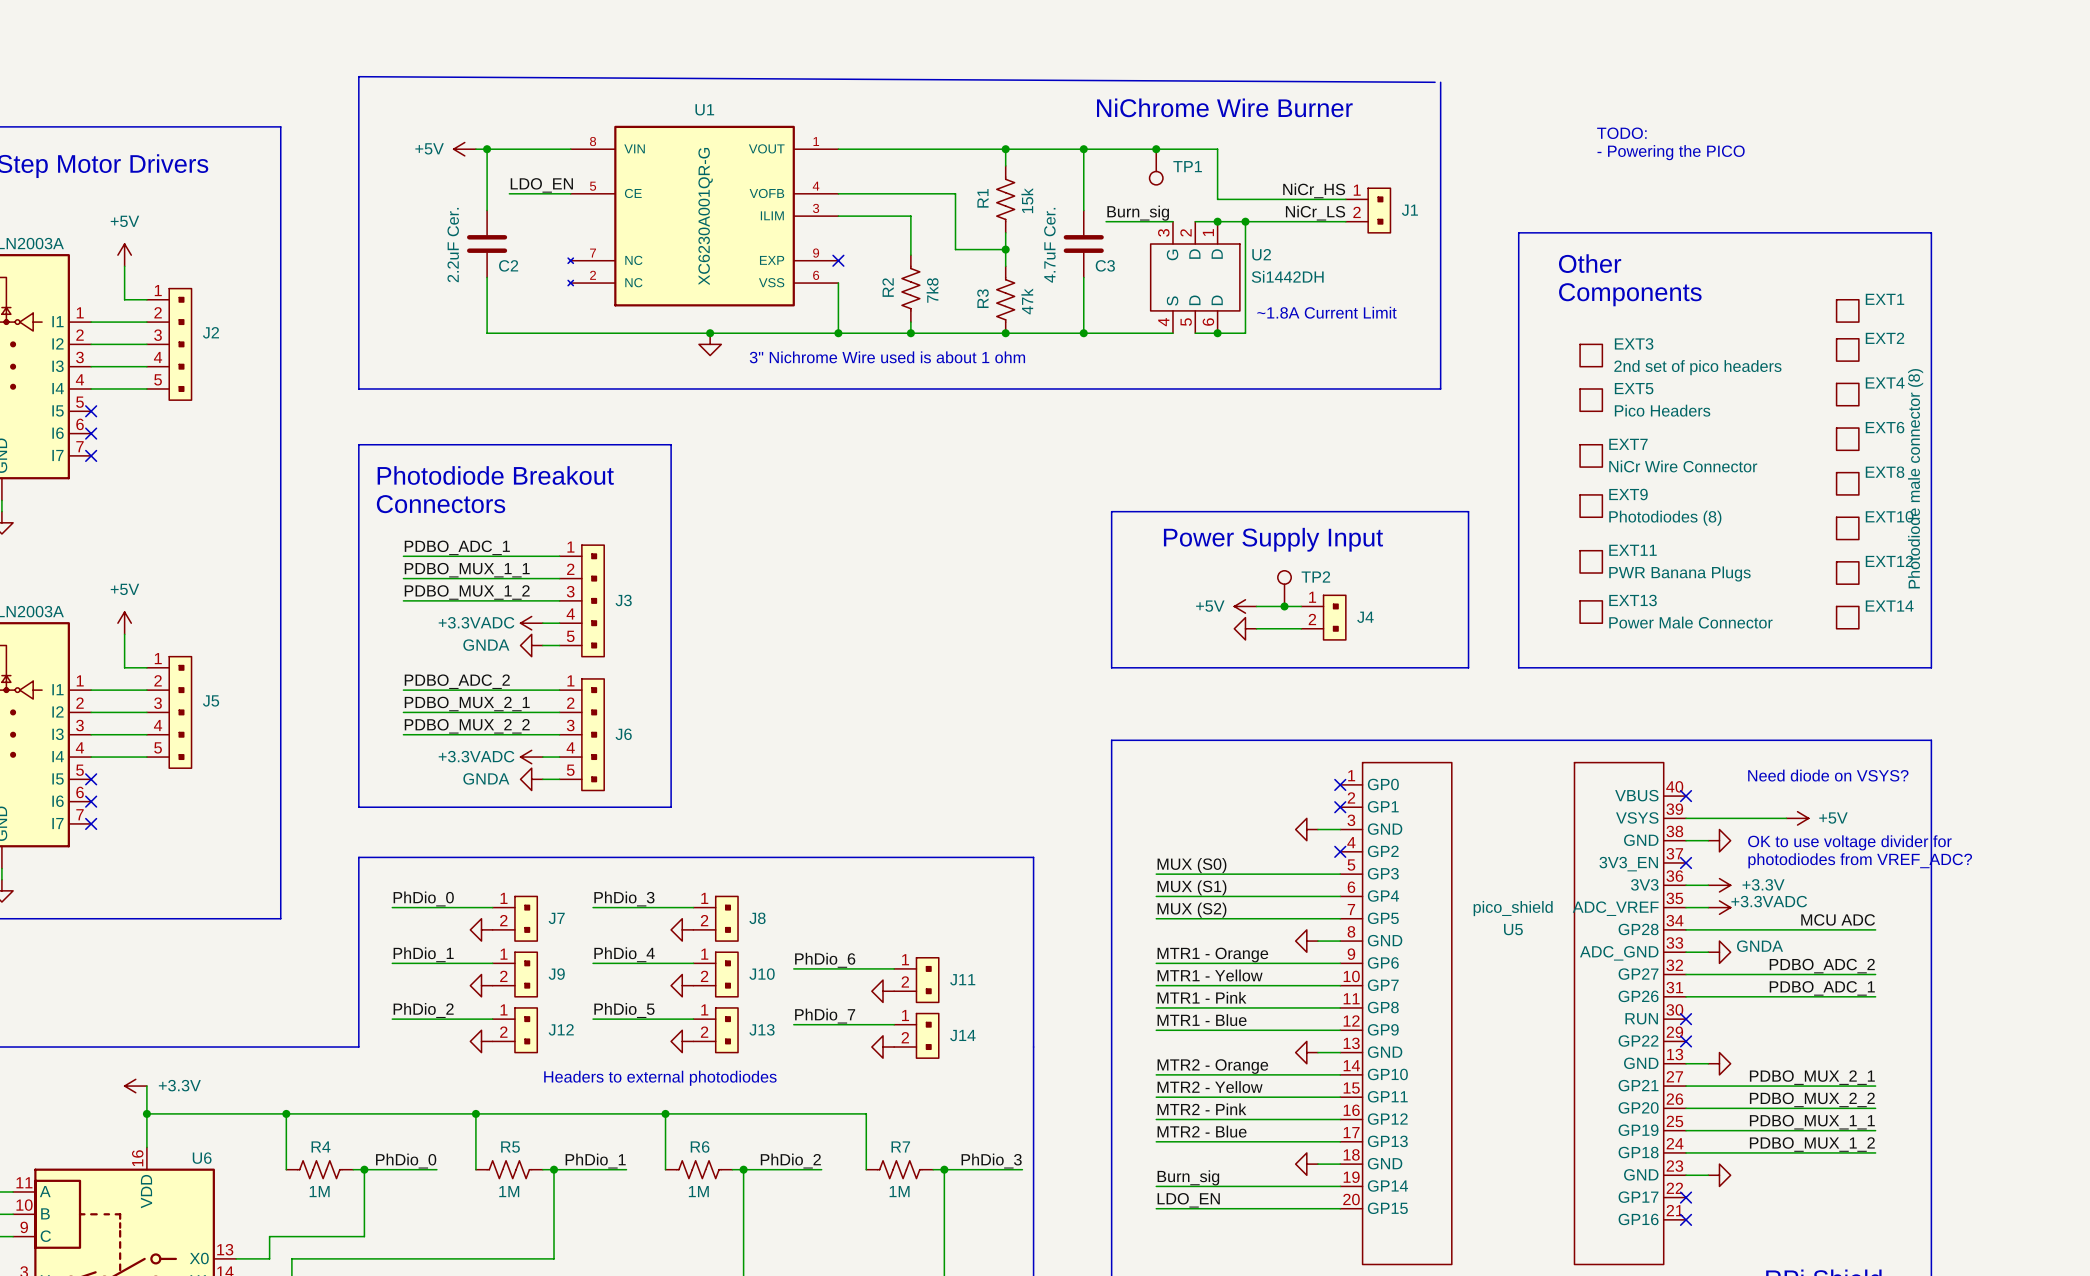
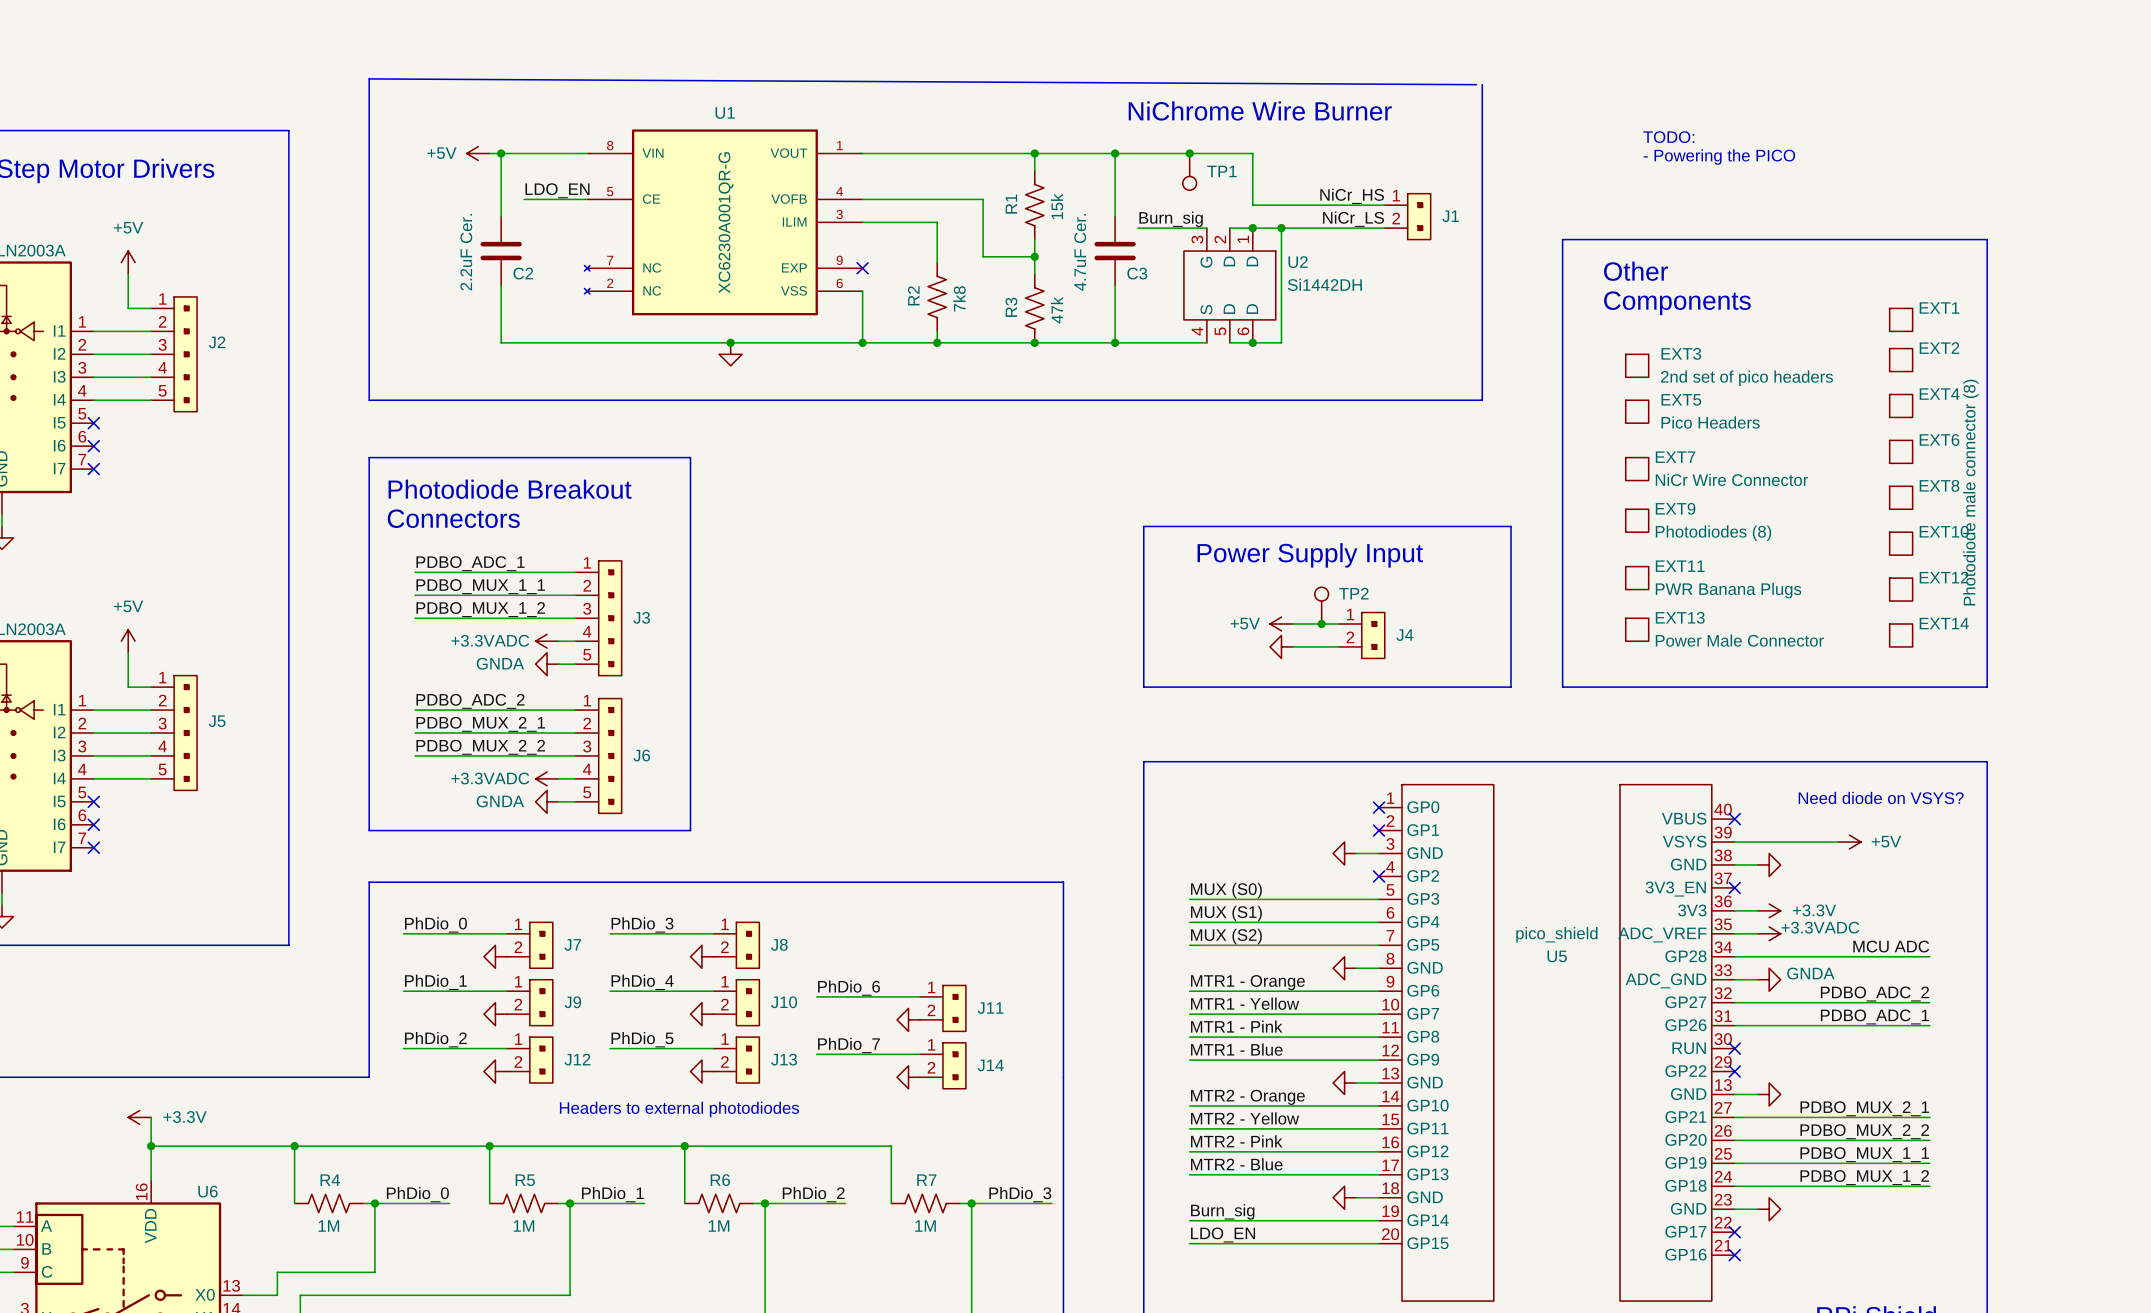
text: ~1.8A Current Limit (1326, 312) -> none
text: 3" Nichrome Wire used is about 1 ohm (887, 357) -> none
text: OK to use voltage divider for (1849, 842) -> none
text: photodiodes from VREF_ADC? (1860, 860) -> none

